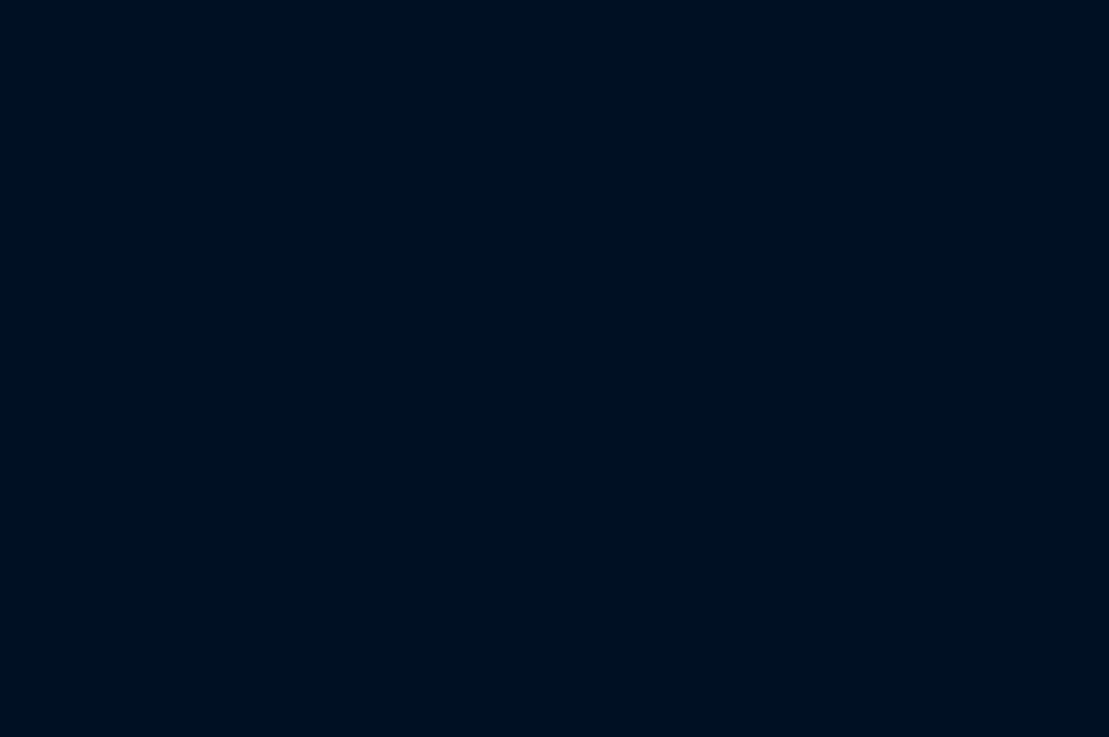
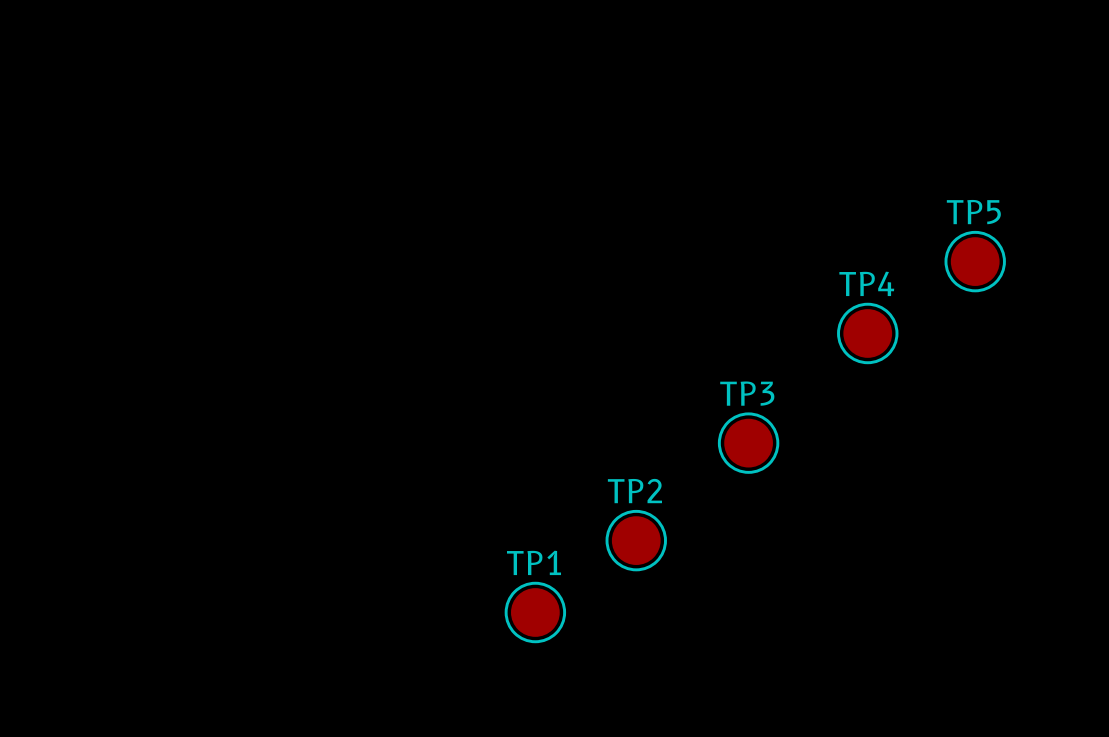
TP5: none -> (975, 261)
TP4: none -> (867, 333)
TP3: none -> (748, 443)
TP2: none -> (636, 540)
TP1: none -> (535, 612)

